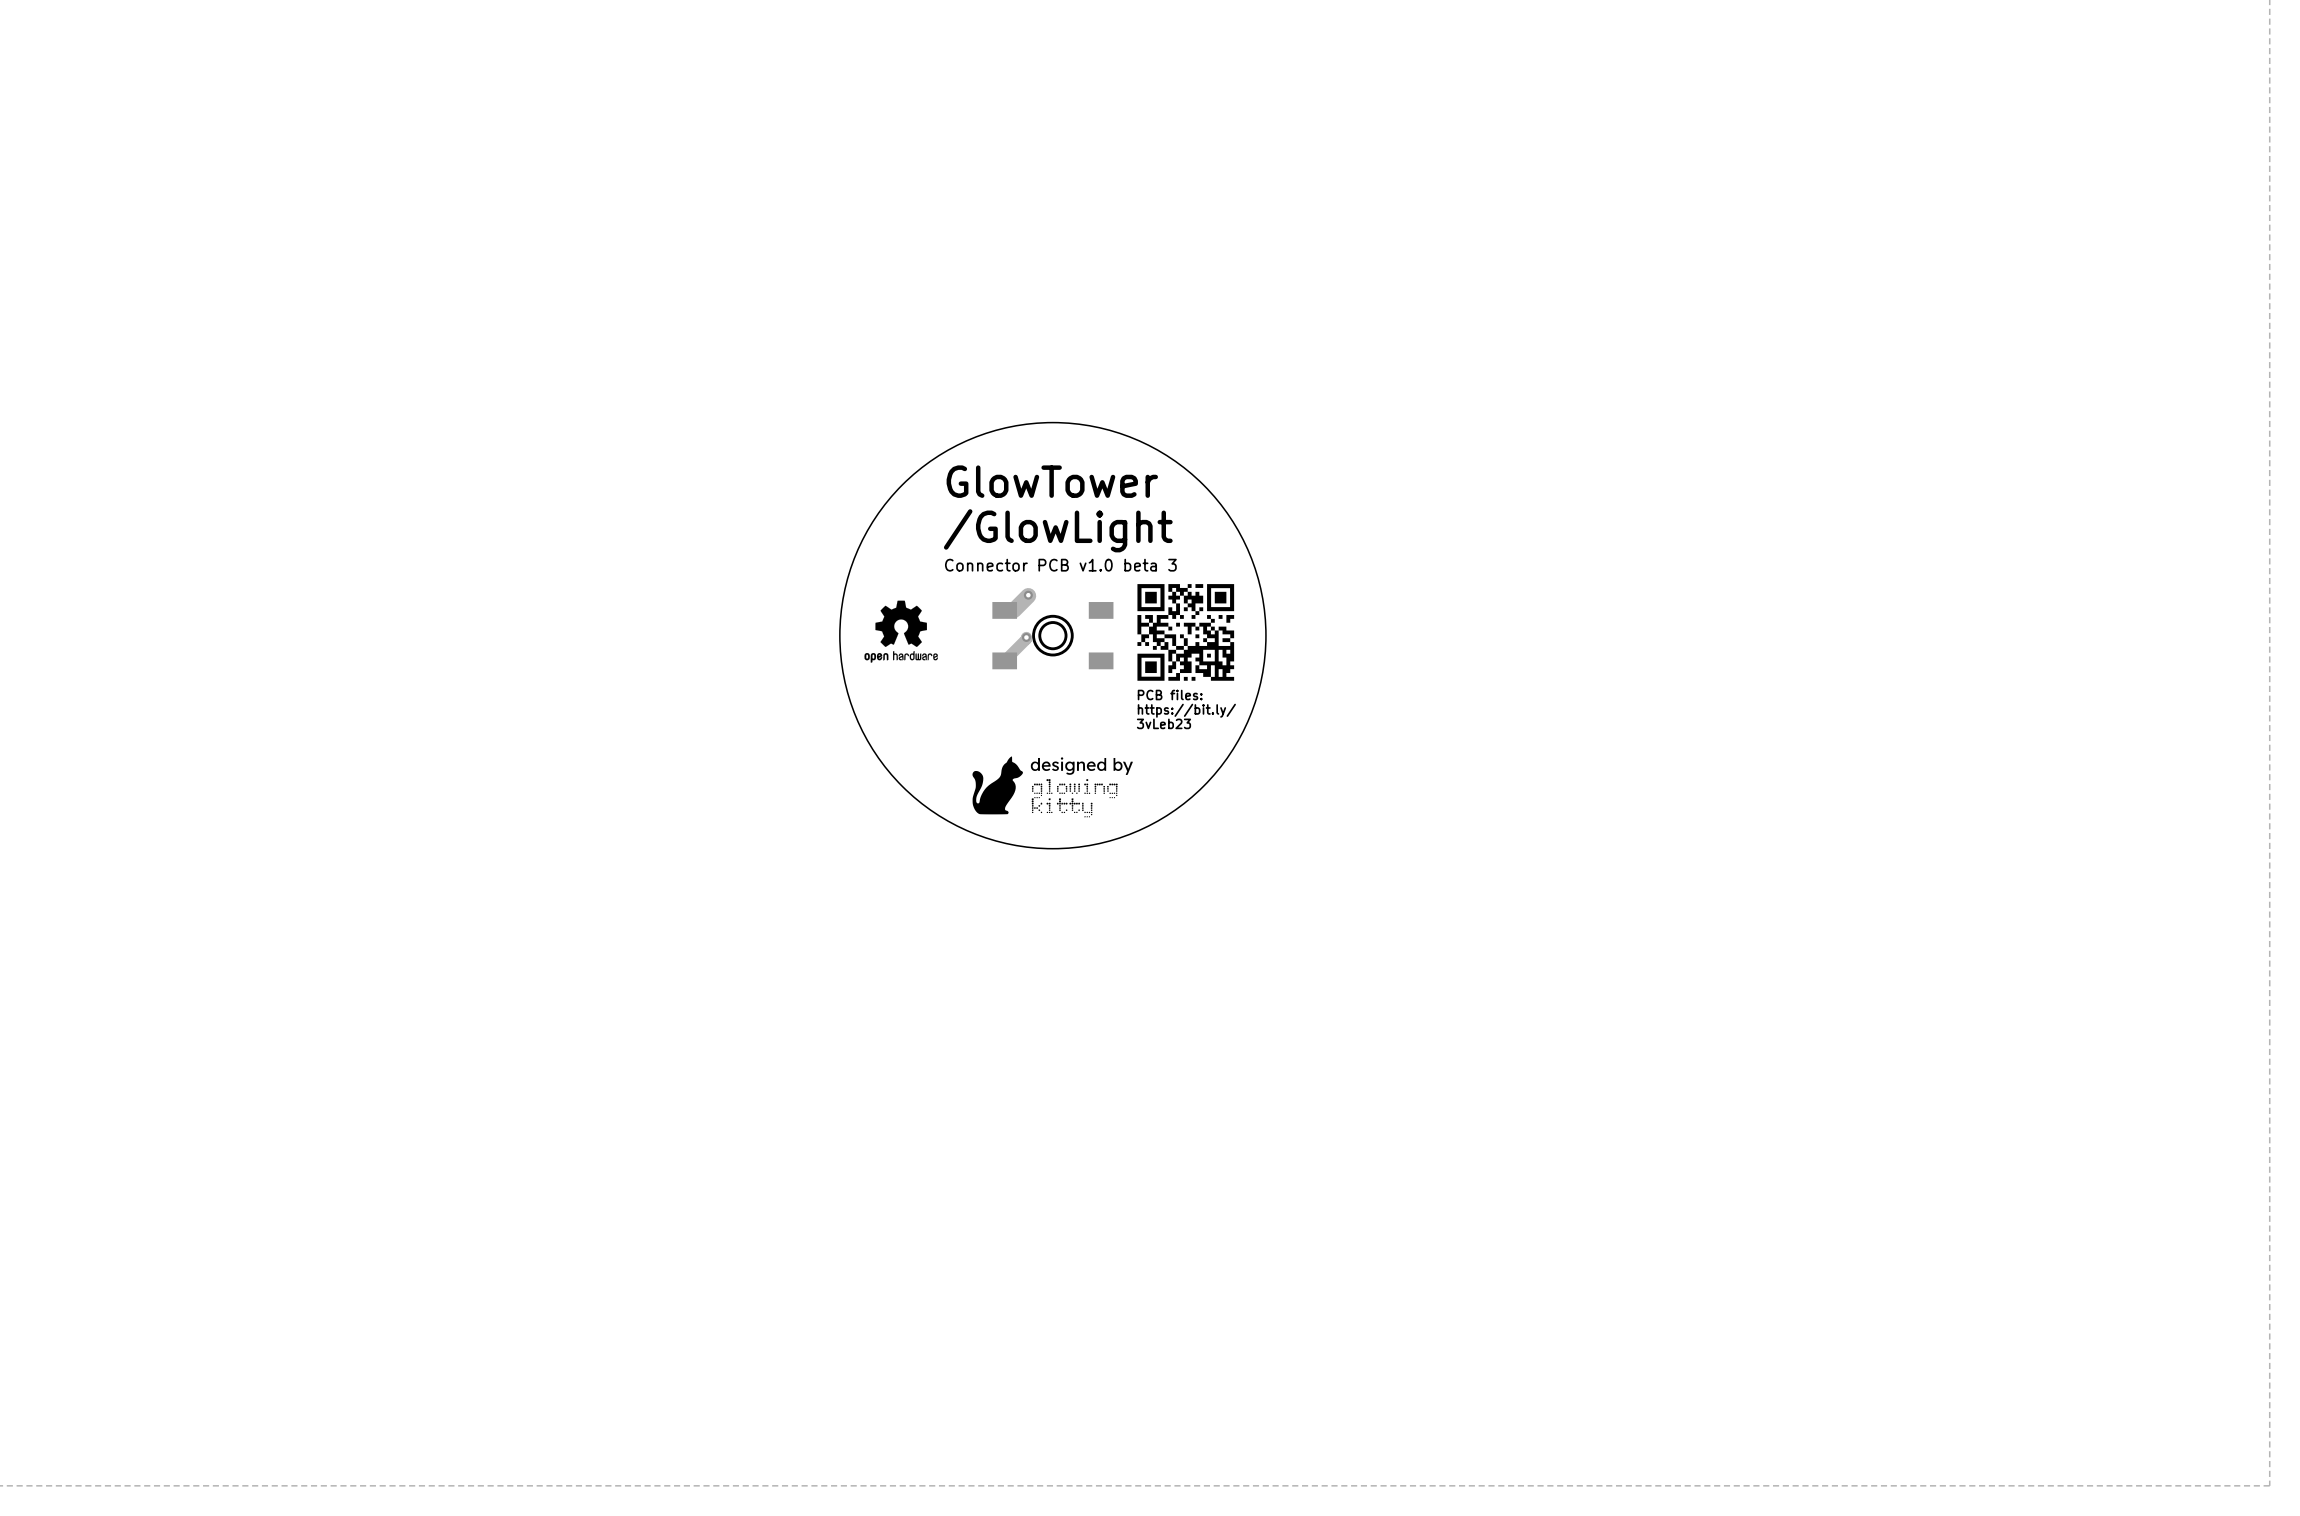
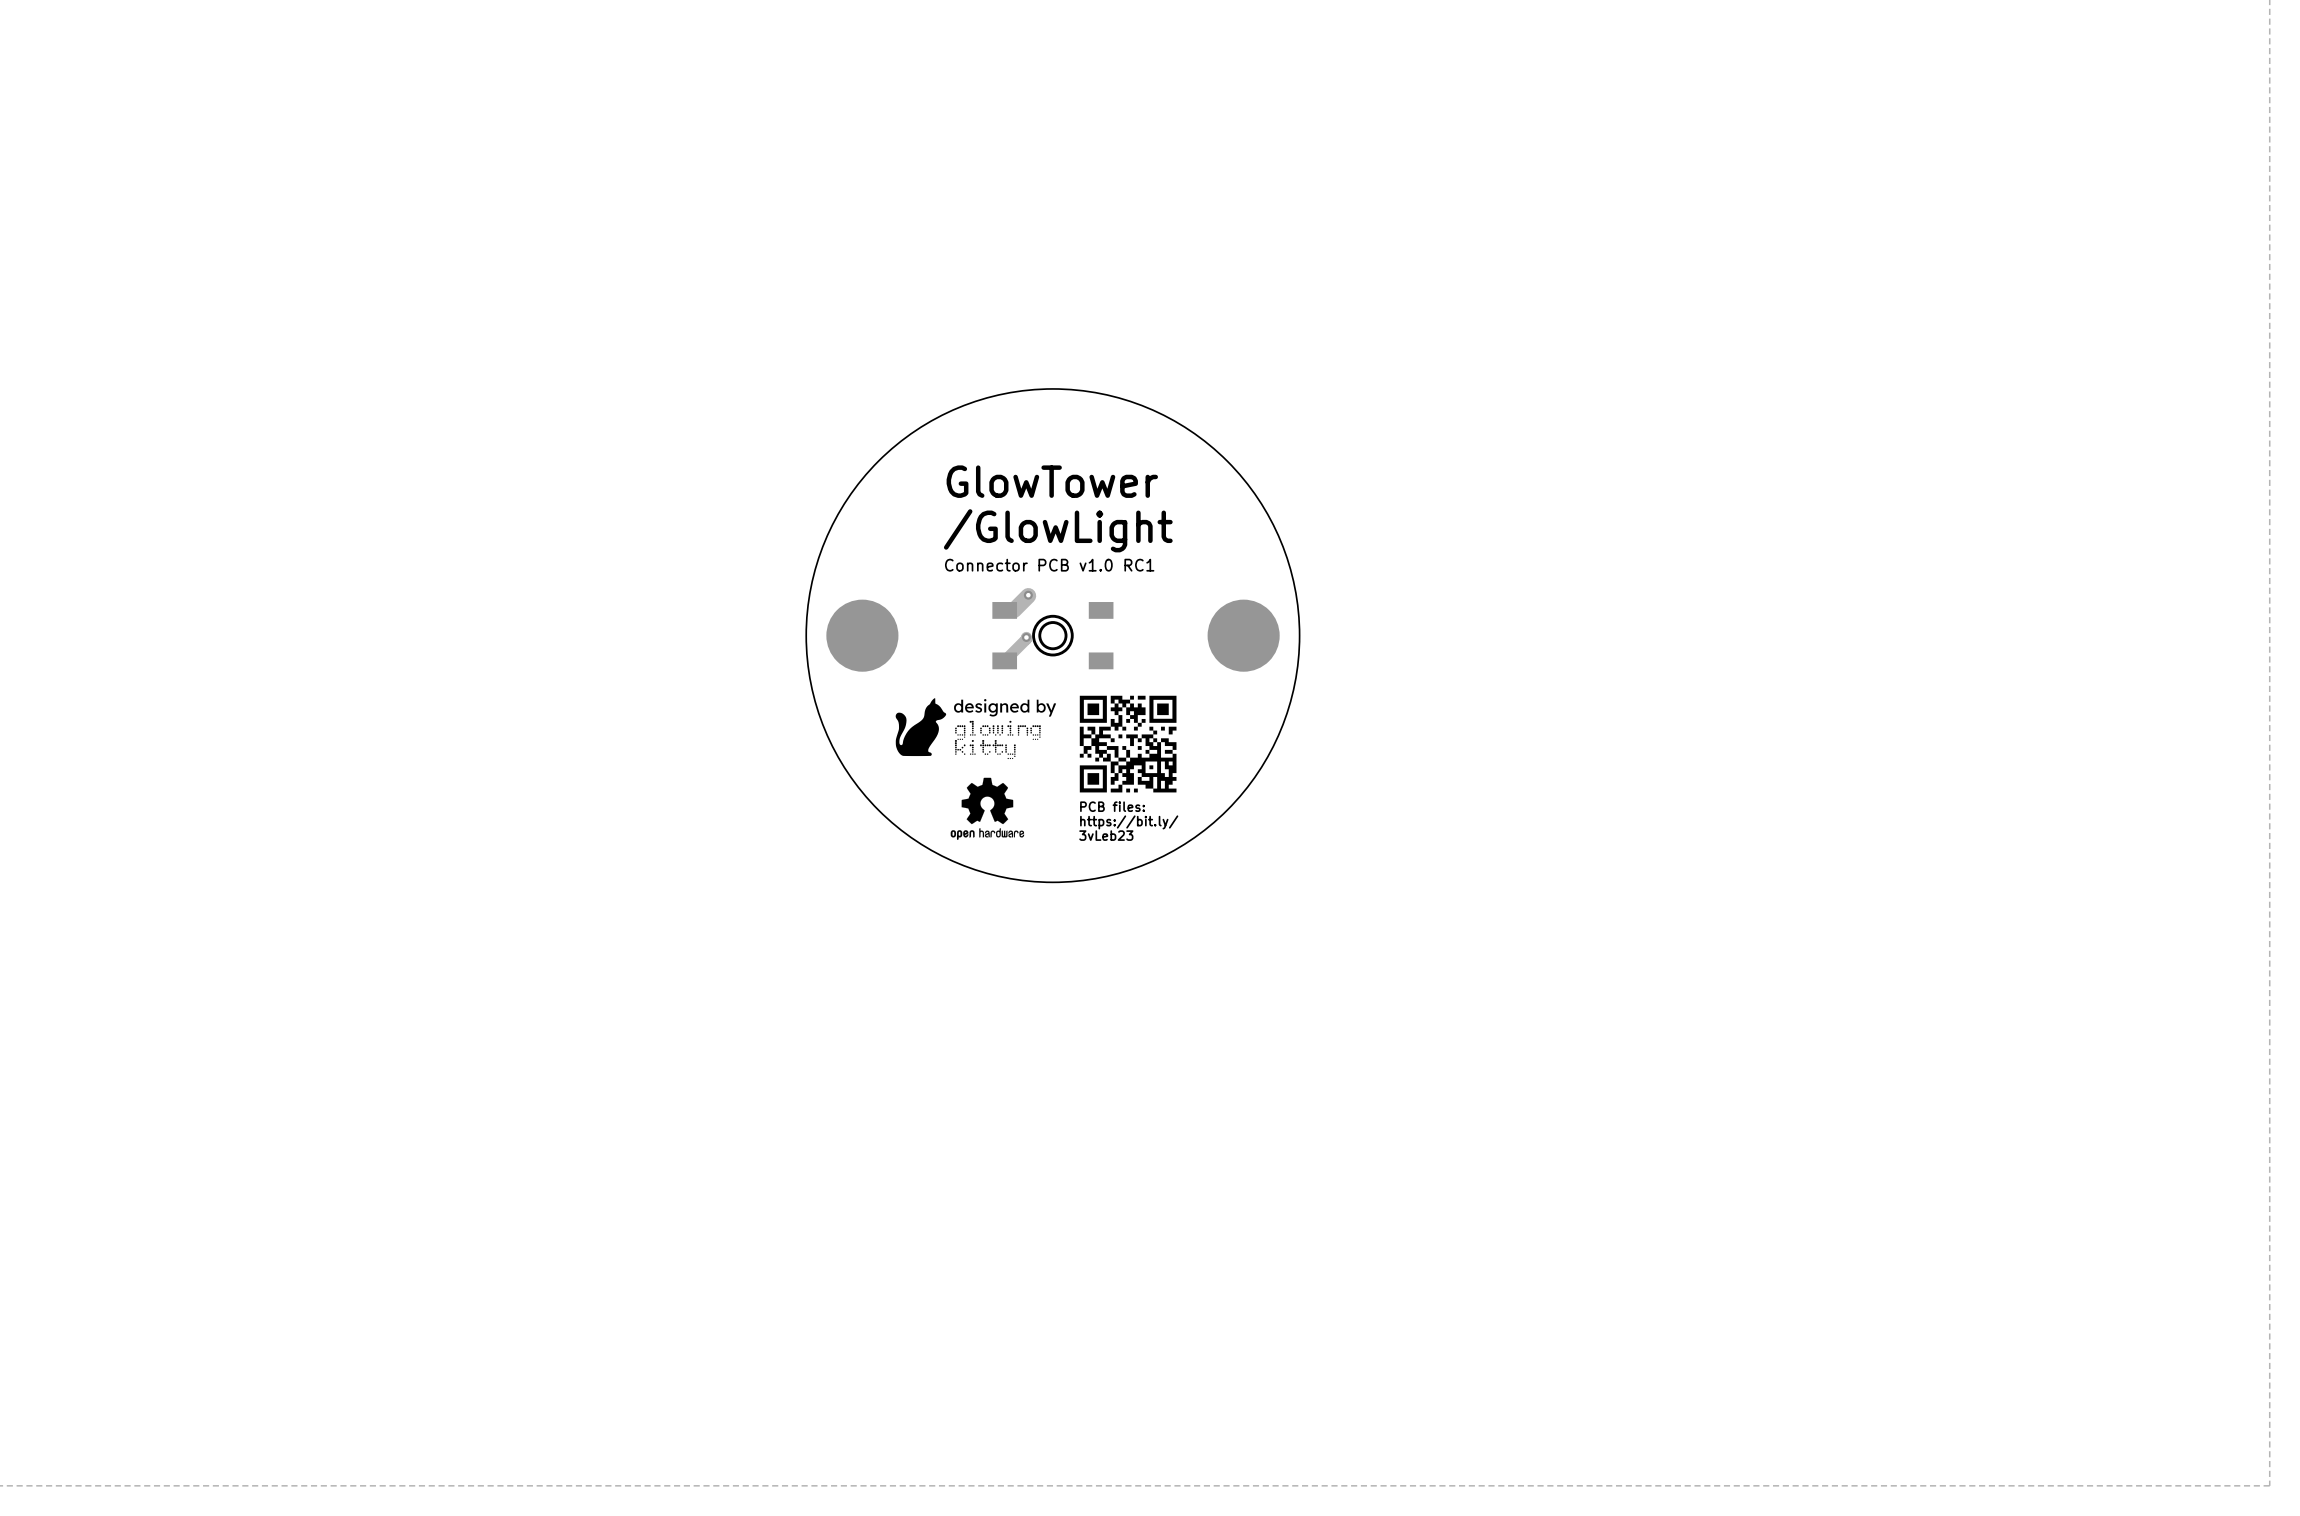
round board edge size: [839, 422, 1267, 850] -> [805, 388, 1301, 884]
text: Connector PCB v1.0 beta 3 (1060, 565) -> Connector PCB v1.0 RC1 (1049, 565)
drawing position: (901, 631) -> (987, 808)
drawing position: (1185, 632) -> (1128, 744)
part: none -> (862, 635)
part: none -> (1243, 635)
text position: PCB files: (1170, 695) -> PCB files: (1112, 806)
text position: https://bit.ly/ (1186, 710) -> https://bit.ly/ (1129, 822)
text position: 3vLeb23 (1163, 723) -> 3vLeb23 (1106, 835)
drawing position: (1052, 786) -> (975, 728)

